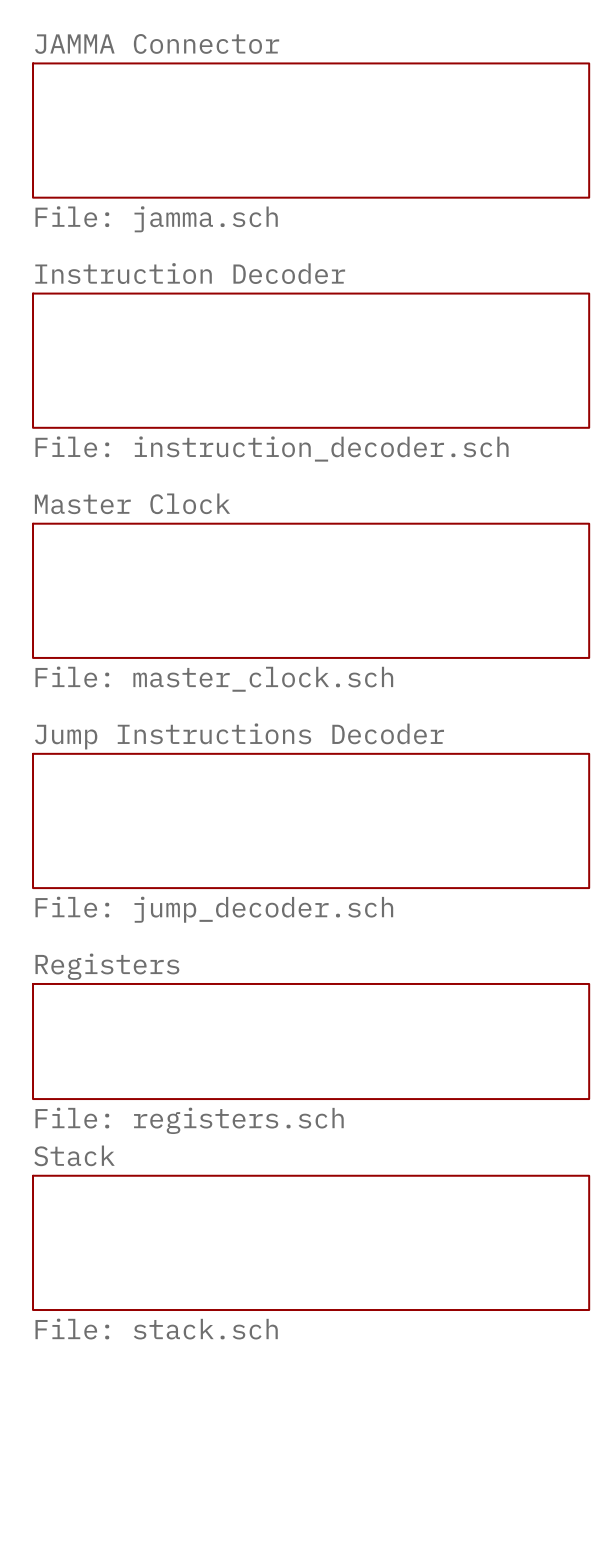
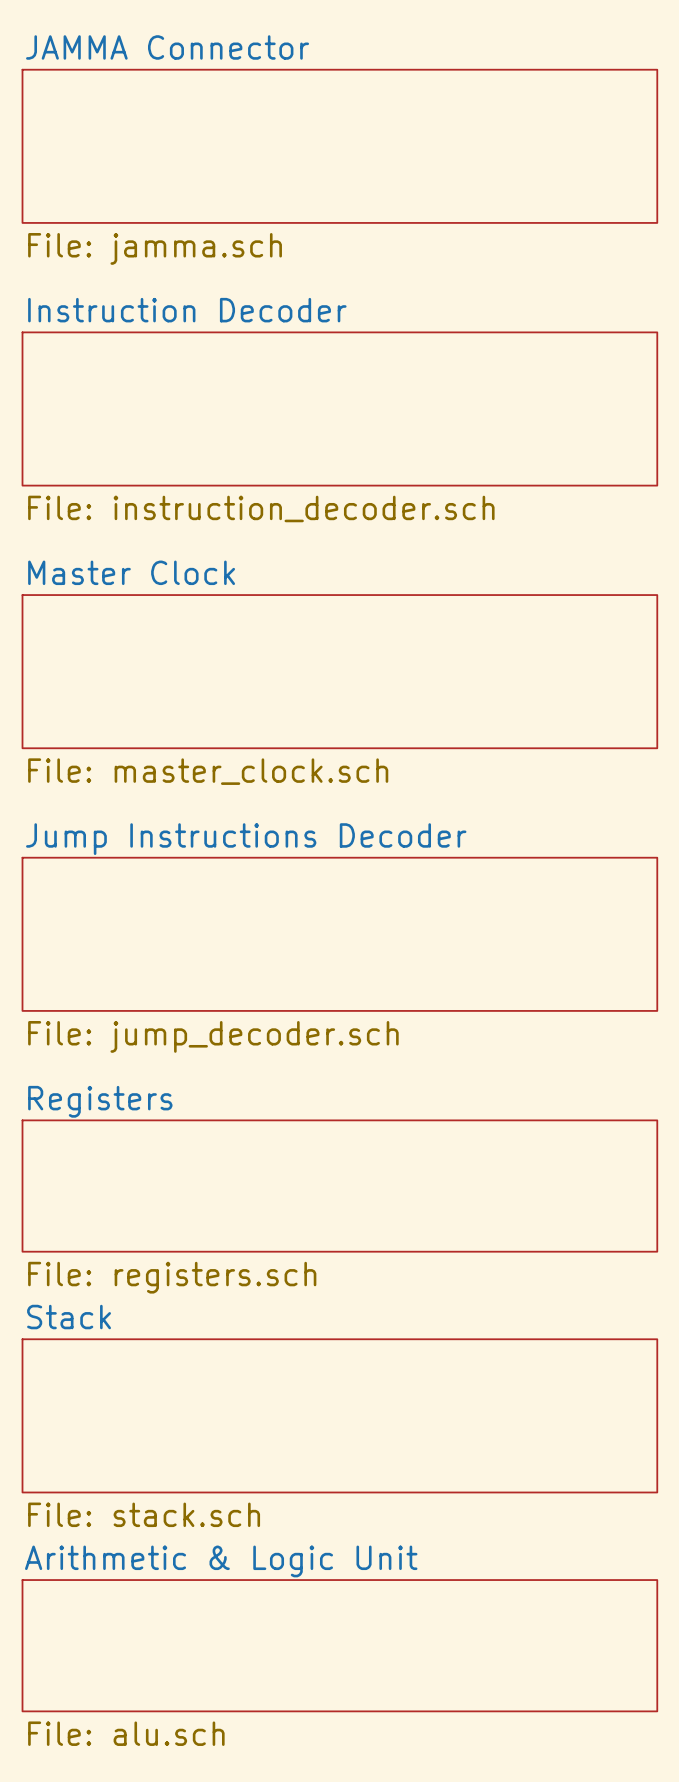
sheet Arithmetic & Logic Unit: none -> File: alu.sch (339, 1645)

